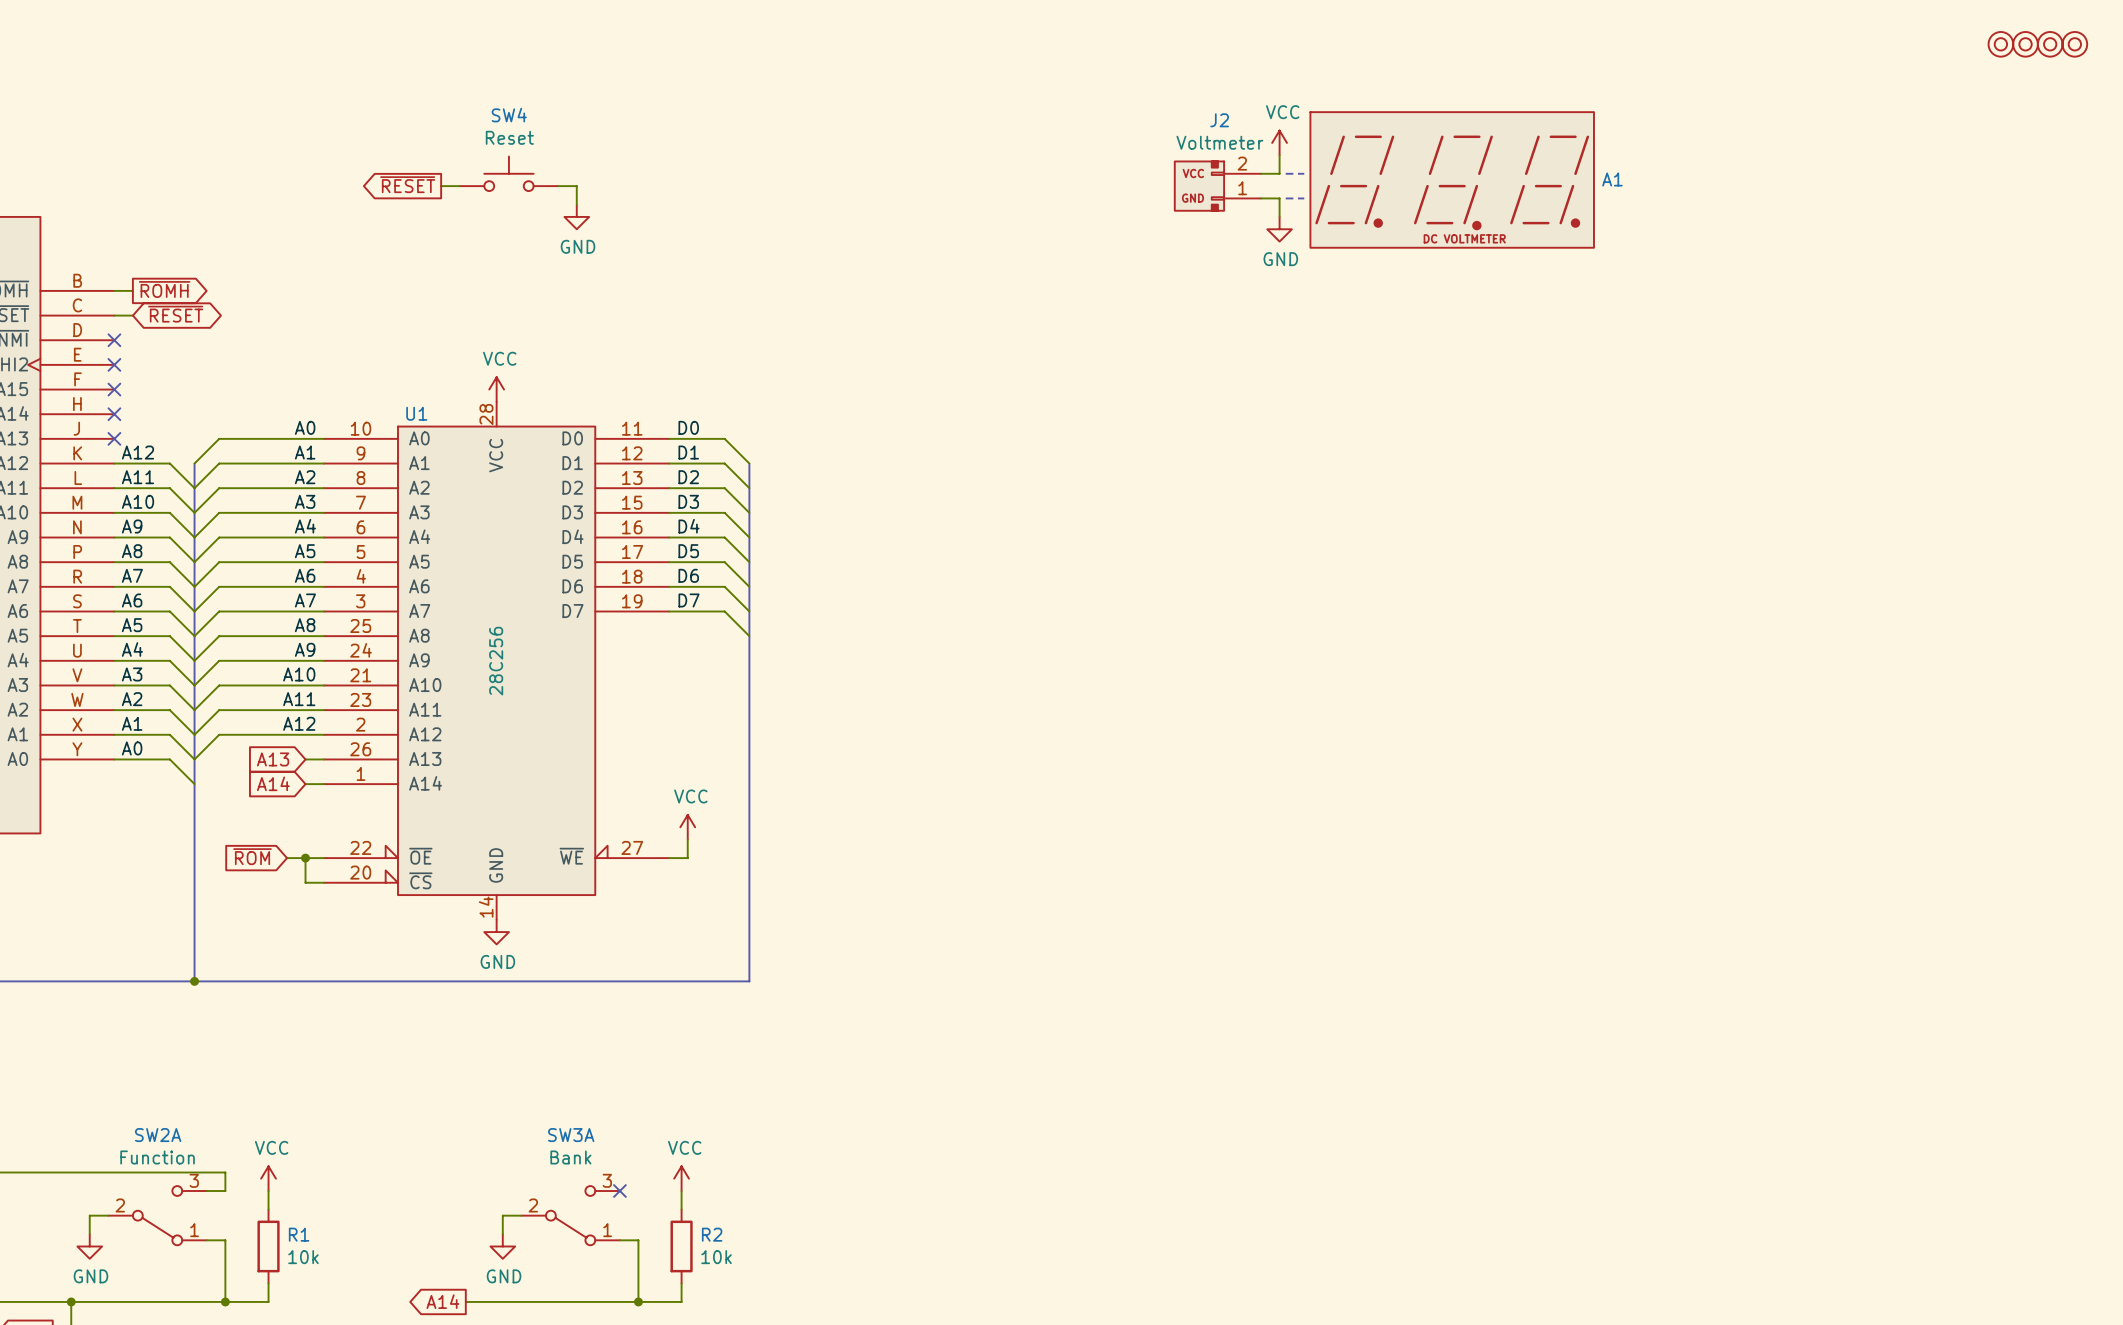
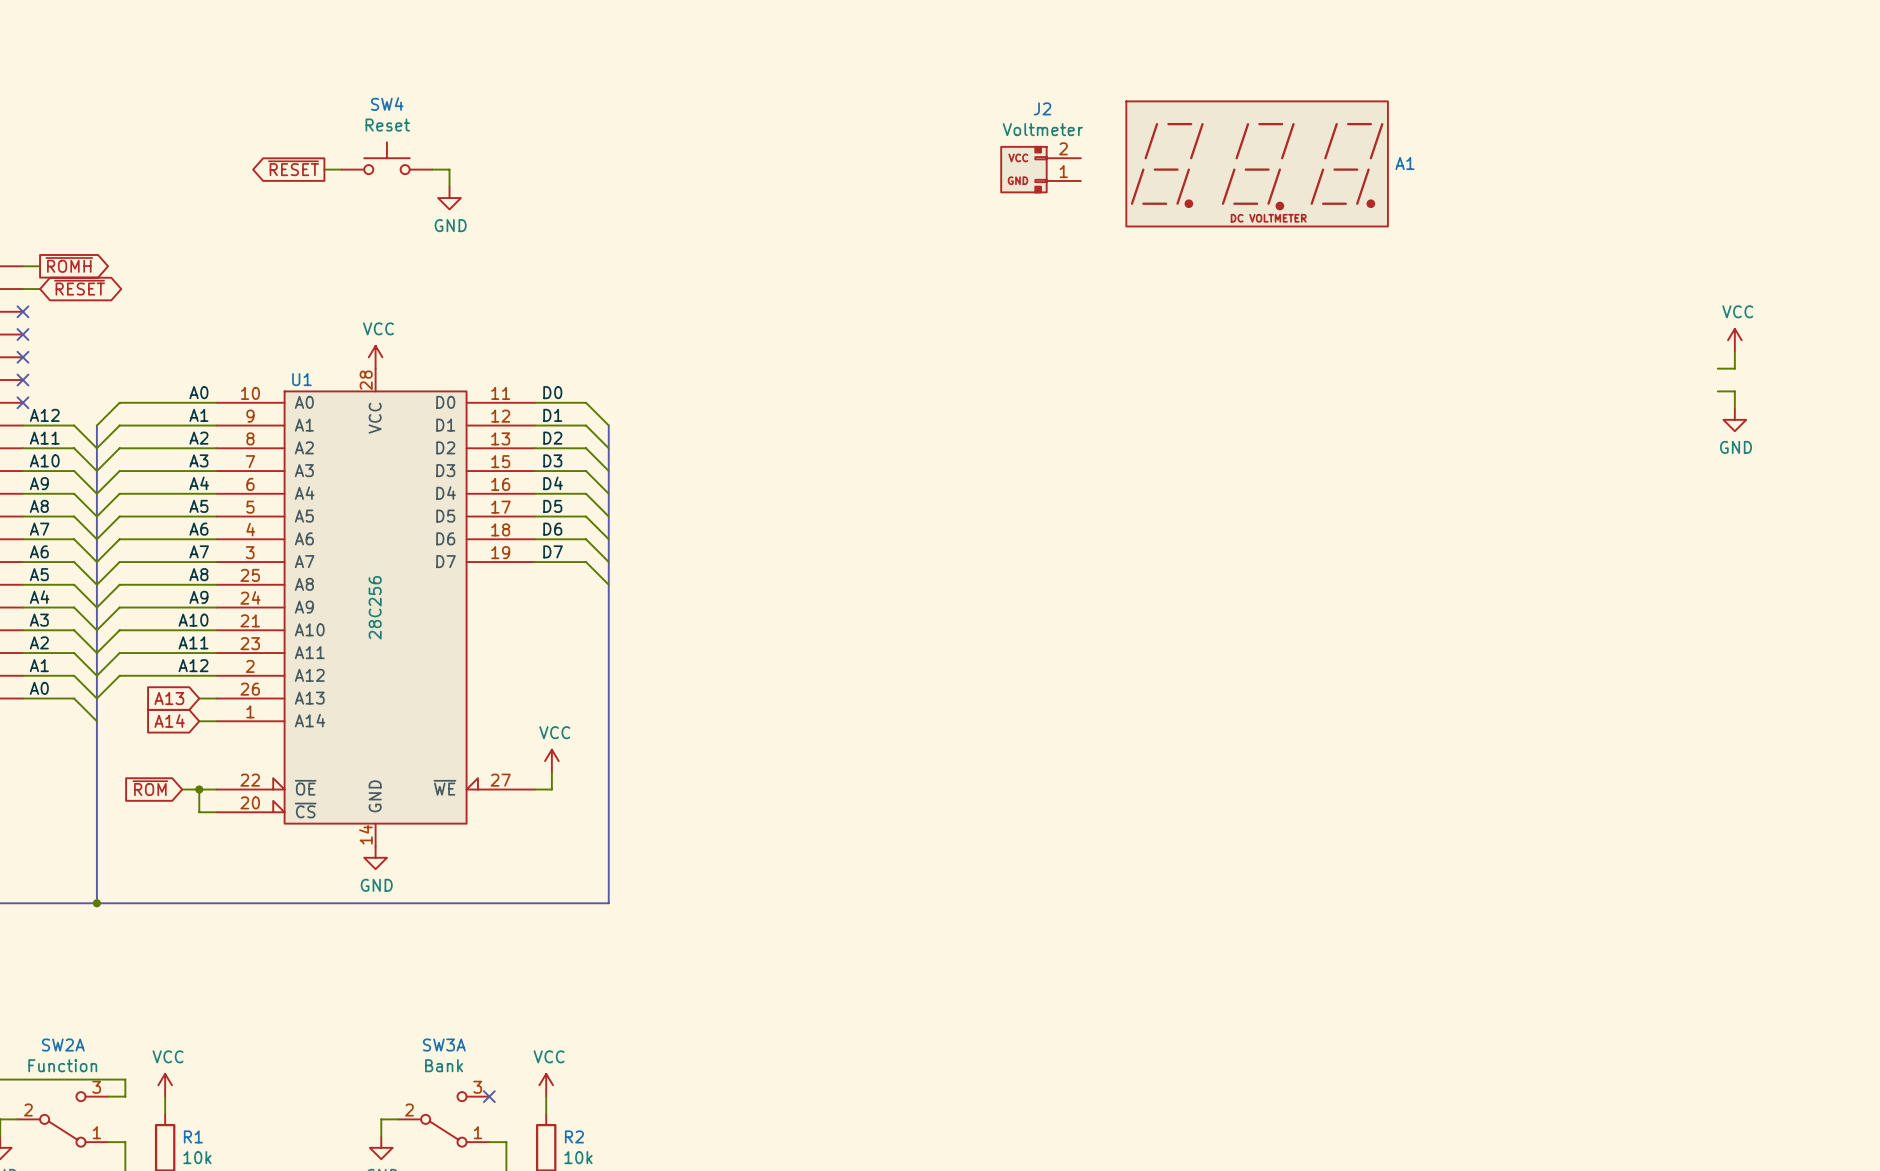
part: (2000, 44) -> none
part: (2025, 44) -> none
part: (2050, 44) -> none
part: (2074, 44) -> none
power symbol: VCC (1279, 142) -> none
wire: (1279, 155) (1279, 173) (1261, 173) -> none
line: (1285, 173) (1304, 173) -> none
wire: (1261, 198) (1279, 198) (1279, 216) -> none
line: (1285, 198) (1304, 198) -> none
power symbol: GND (1279, 229) -> none
power symbol: none -> VCC (1734, 340)
wire: none -> (1734, 351) (1734, 368) (1717, 368)
wire: none -> (1717, 391) (1734, 391) (1734, 408)
power symbol: none -> GND (1734, 419)

